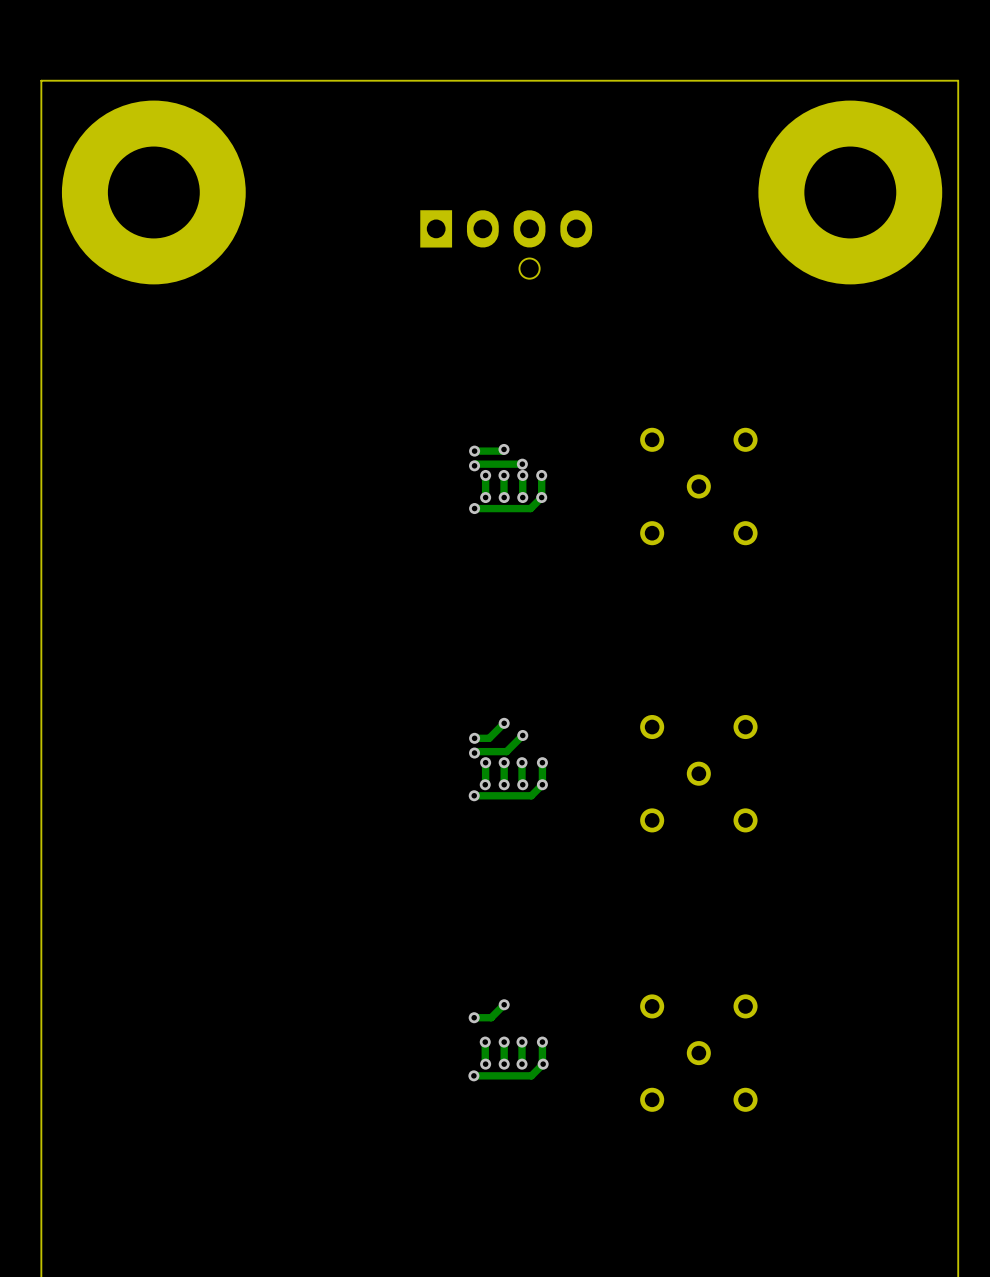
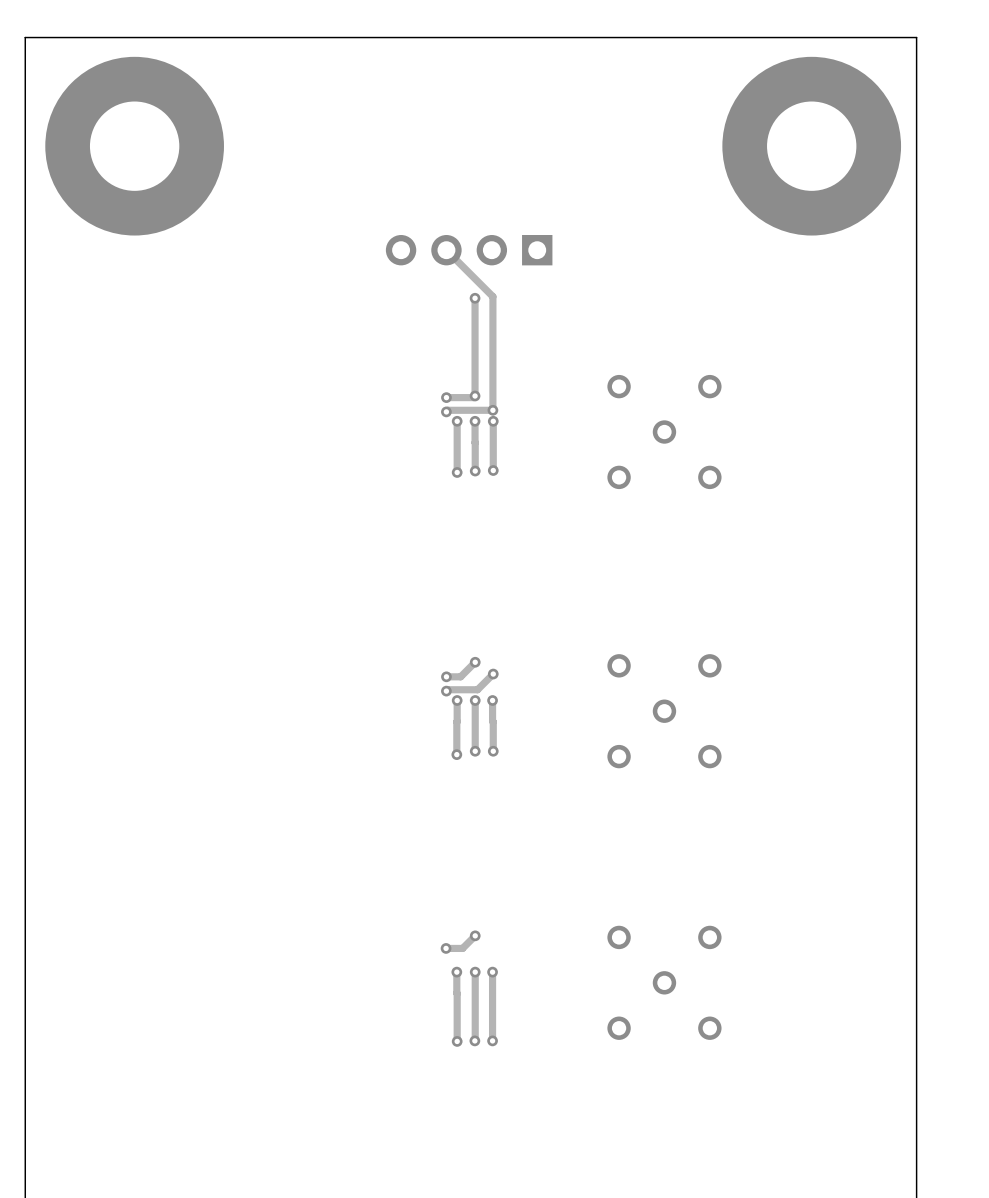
part: (506, 244) -> none
track: none -> (446, 250) (492, 296) (492, 410)
part: none -> (469, 250)
track: none -> (475, 298) (475, 396)
via: none -> (475, 298)
track: (541, 475) (541, 497) (530, 508) (474, 508) -> none
via: (541, 475) -> none
track: none -> (457, 442) (457, 472)
via: (485, 497) -> none
track: none -> (475, 442) (475, 471)
via: (504, 497) -> none
track: none -> (493, 442) (493, 470)
via: (522, 497) -> none
via: (541, 497) -> none
via: (474, 508) -> none
via: none -> (475, 471)
via: none -> (493, 470)
via: none -> (457, 472)
track: (542, 762) (542, 784) (531, 795) (474, 795) -> none
via: (542, 762) -> none
track: none -> (456, 721) (456, 754)
via: (485, 784) -> none
track: none -> (475, 721) (475, 751)
via: (504, 784) -> none
track: none -> (493, 721) (493, 751)
via: (522, 784) -> none
via: (542, 784) -> none
via: (474, 795) -> none
via: none -> (475, 751)
via: none -> (493, 751)
via: none -> (456, 754)
track: (542, 1042) (543, 1064) (531, 1075) (473, 1075) -> none
via: (542, 1042) -> none
track: none -> (457, 993) (457, 1041)
via: (485, 1064) -> none
track: none -> (475, 993) (474, 1040)
via: (504, 1064) -> none
track: none -> (492, 993) (492, 1040)
via: (522, 1064) -> none
via: (543, 1064) -> none
via: (473, 1075) -> none
via: none -> (474, 1040)
via: none -> (492, 1040)
via: none -> (457, 1041)

